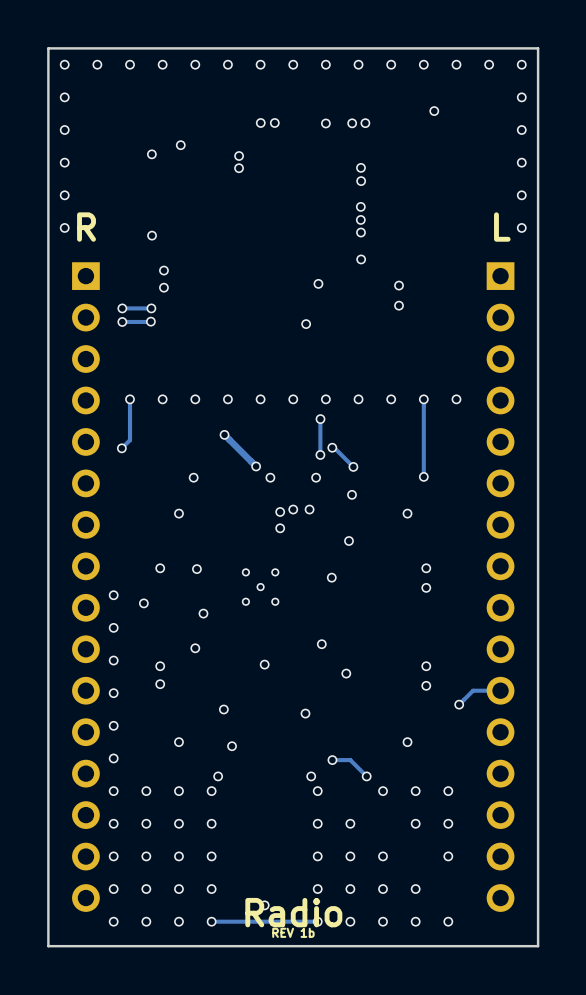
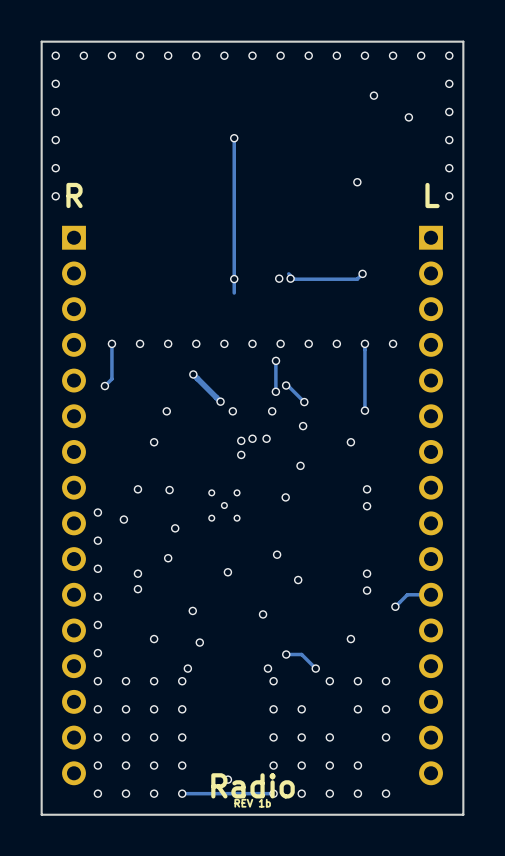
via: (260, 122) -> none
via: (274, 122) -> none
via: (325, 123) -> none
via: (352, 123) -> none
via: (365, 123) -> none
via: none -> (408, 117)
via: (180, 145) -> none
via: (151, 154) -> none
via: (239, 156) -> none
track: none -> (234, 138) (234, 292)
via: none -> (234, 138)
via: (360, 167) -> none
via: (239, 168) -> none
via: (361, 181) -> none
via: (360, 206) -> none
via: none -> (357, 182)
via: (360, 219) -> none
via: (360, 232) -> none
via: (152, 235) -> none
via: (361, 259) -> none
via: (163, 270) -> none
via: (318, 283) -> none
via: (399, 285) -> none
via: (163, 287) -> none
via: (399, 305) -> none
via: (122, 308) -> none
track: (151, 308) (122, 308) -> none
via: (151, 308) -> none
track: none -> (362, 273) (357, 279) (294, 279) (288, 273)
via: none -> (362, 273)
via: (122, 321) -> none
track: (150, 321) (122, 321) -> none
via: (150, 321) -> none
via: none -> (279, 278)
via: none -> (290, 278)
via: none -> (234, 279)
via: (306, 324) -> none

